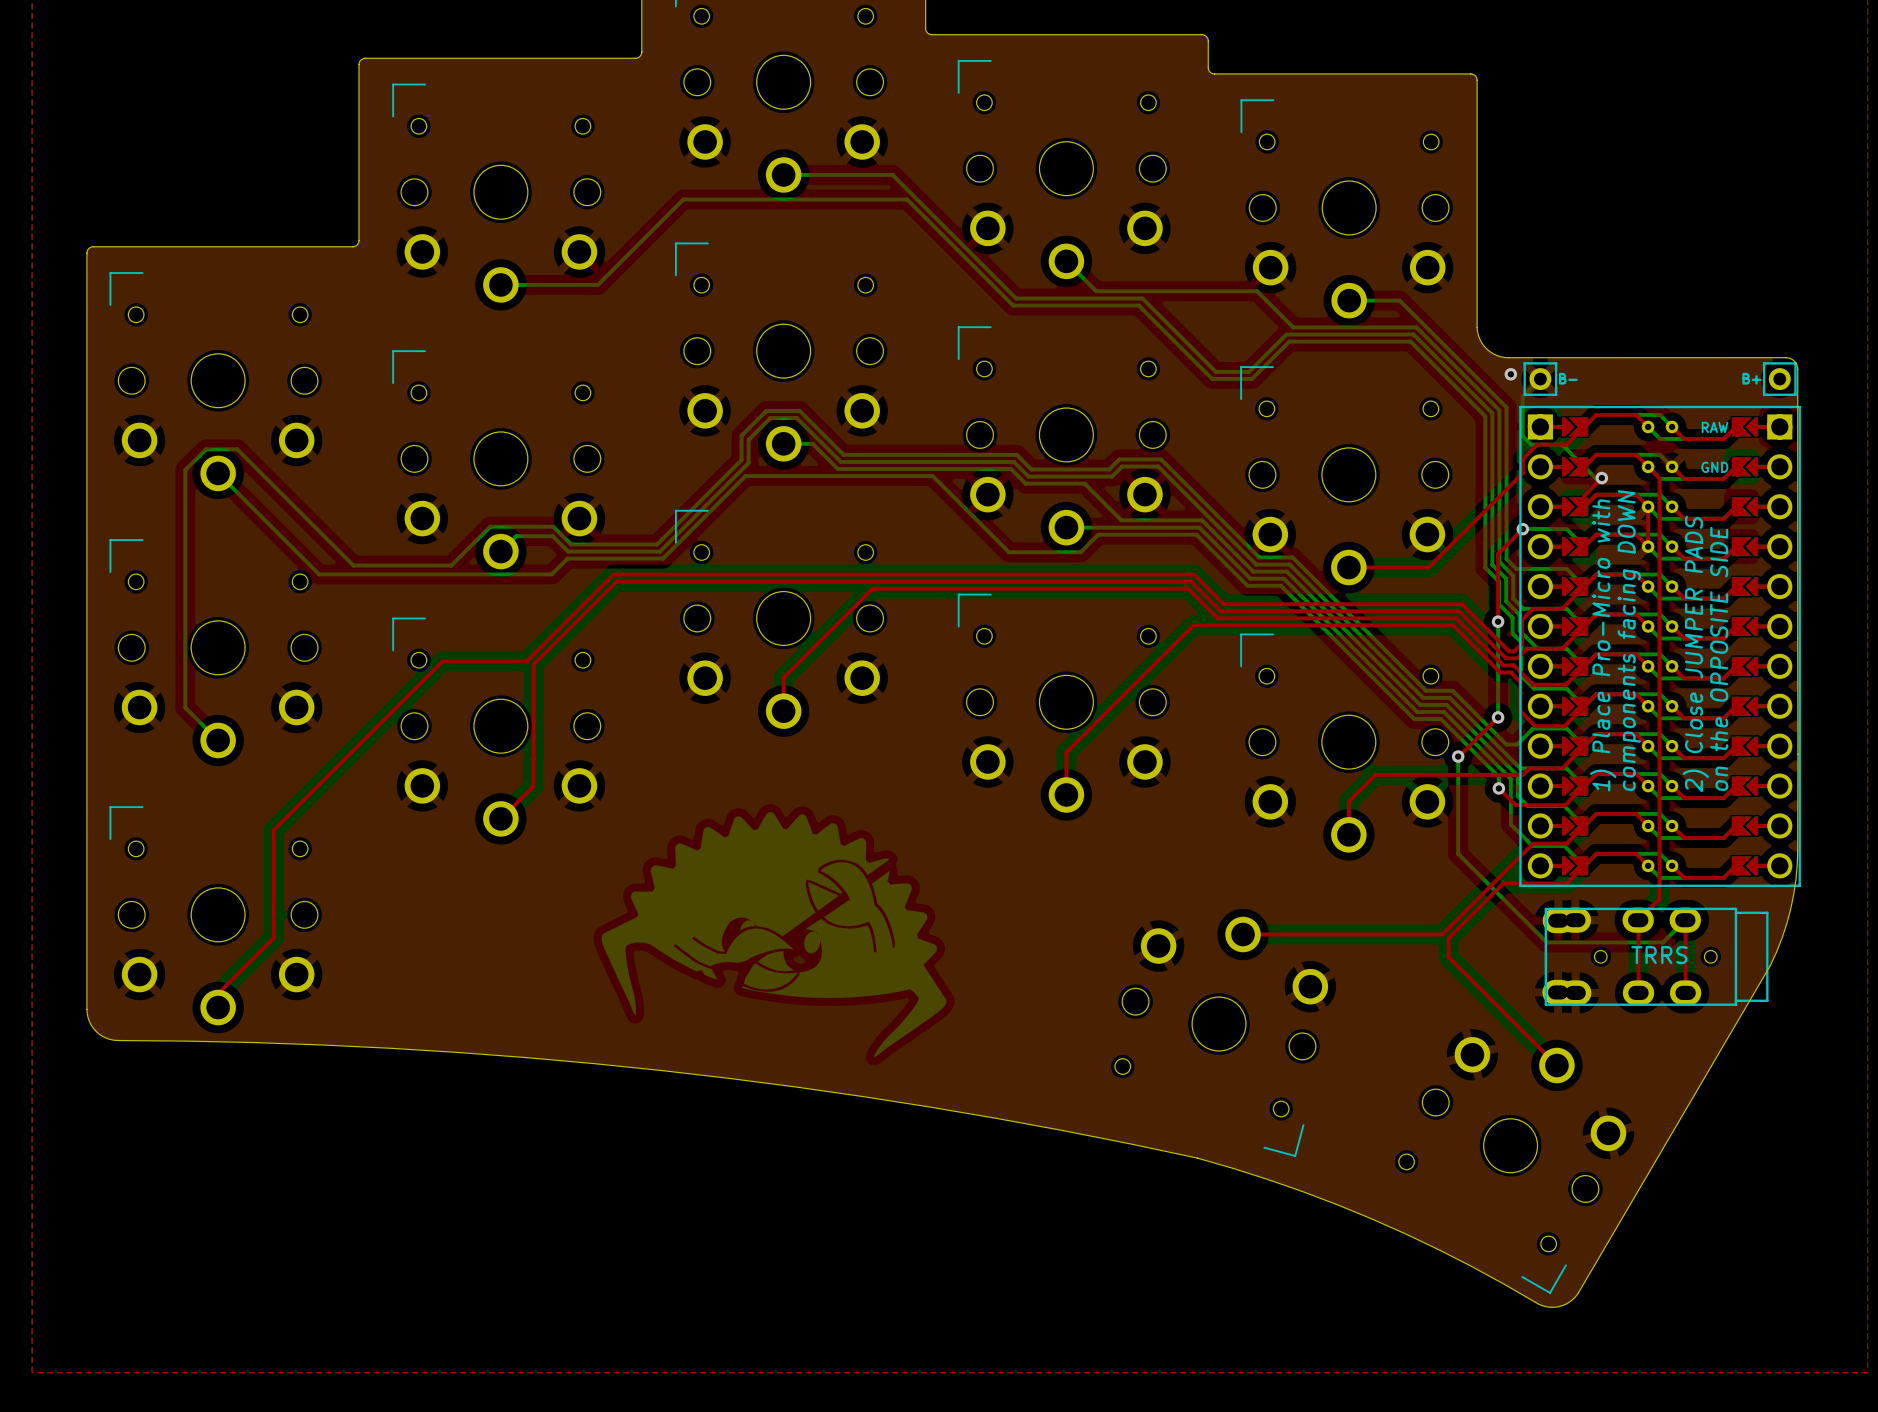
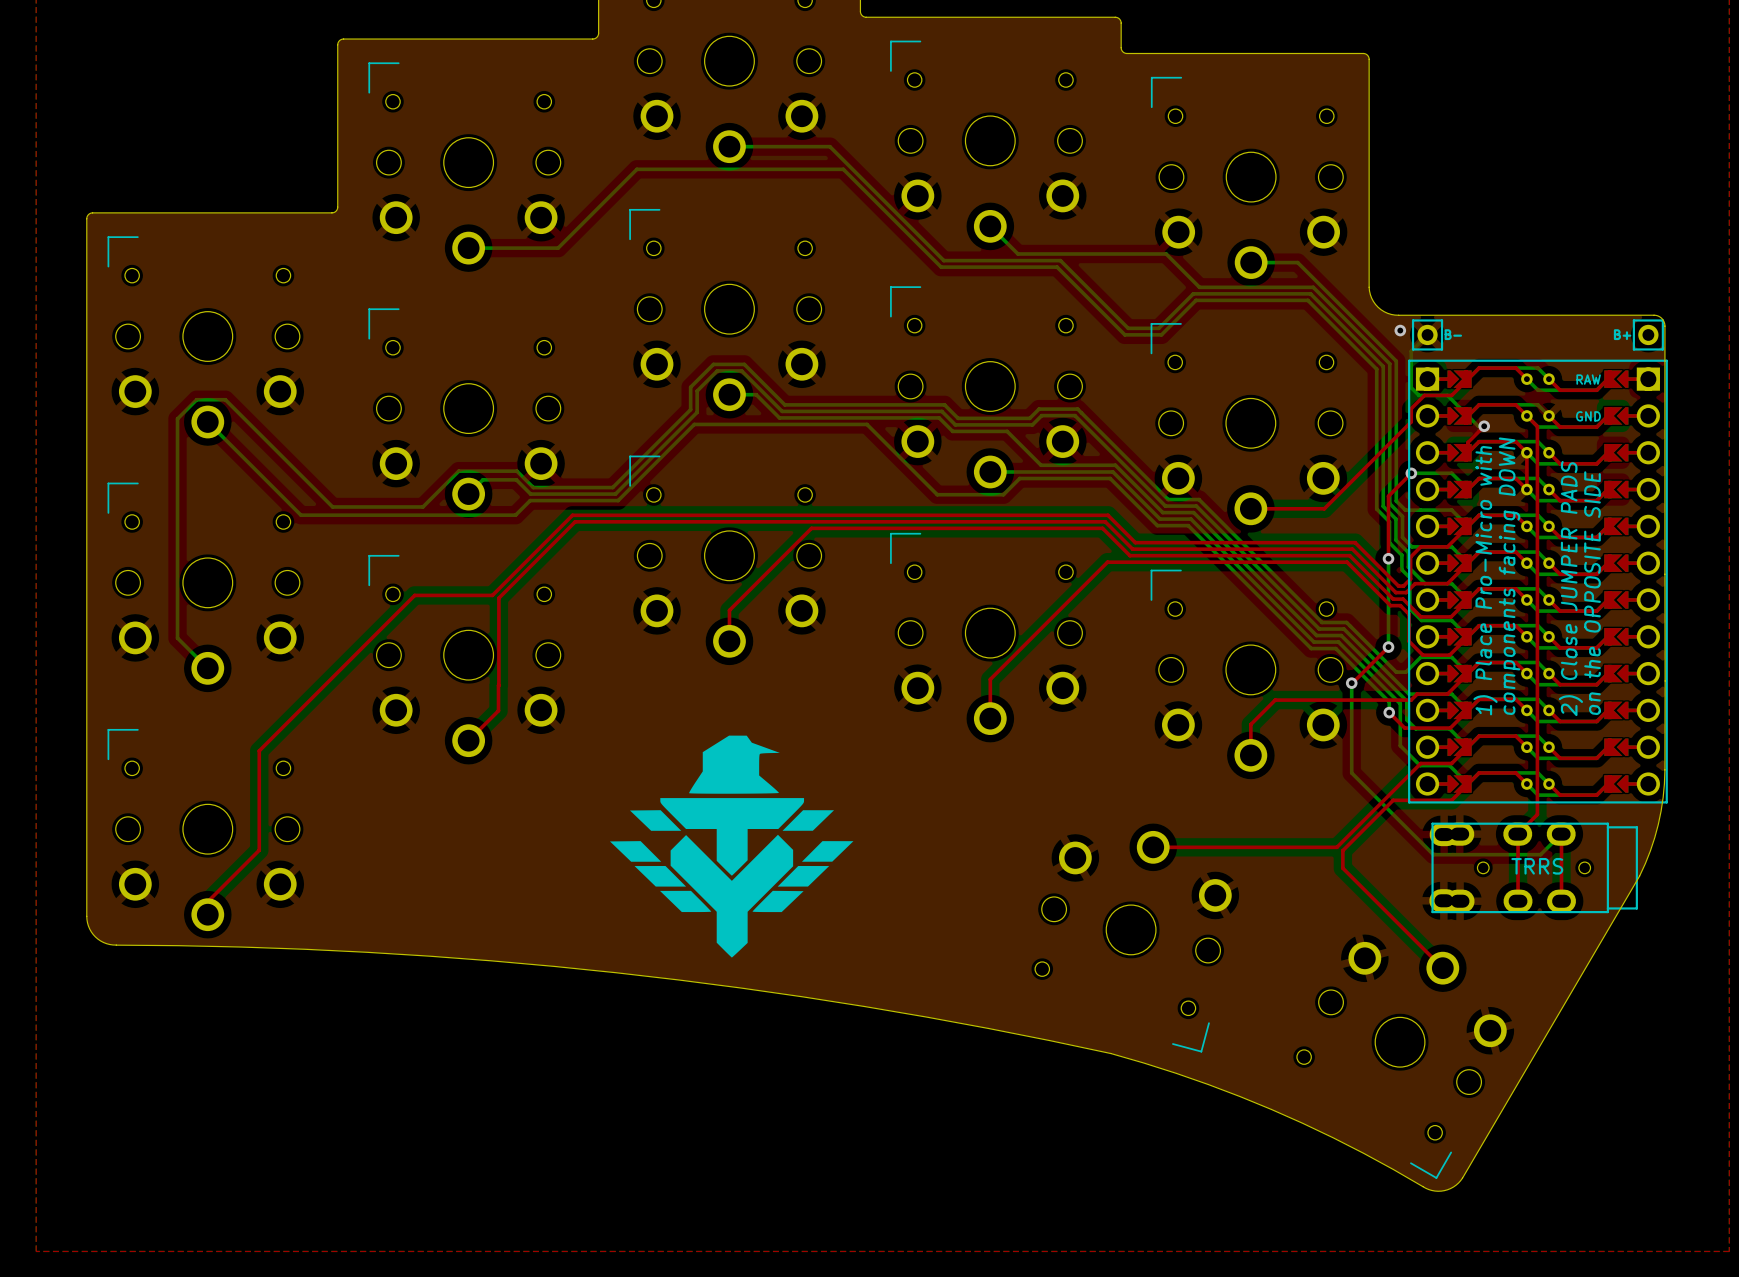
drawing shape: [601, 812, 947, 1058] -> [609, 735, 854, 958]

